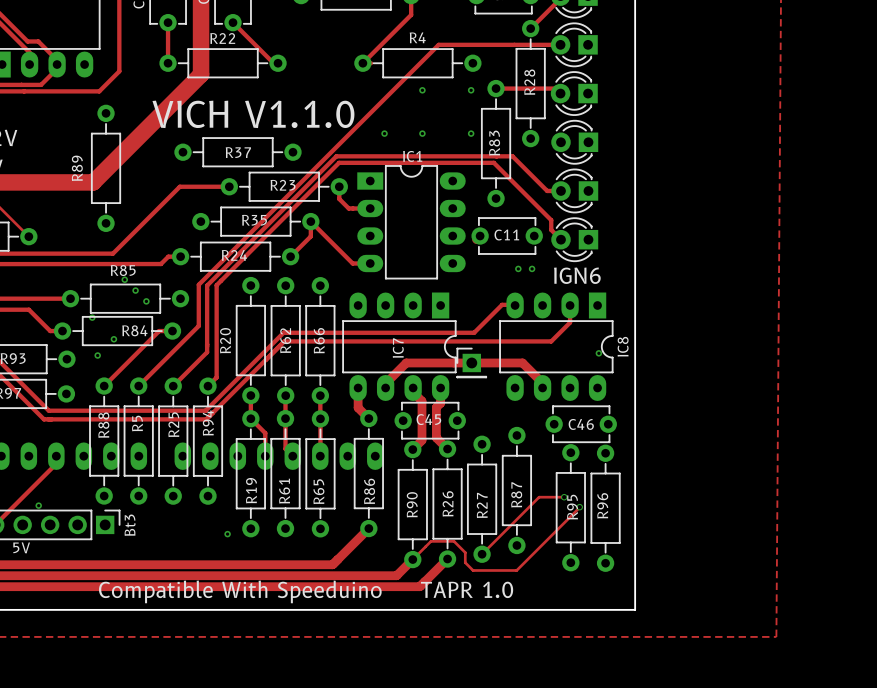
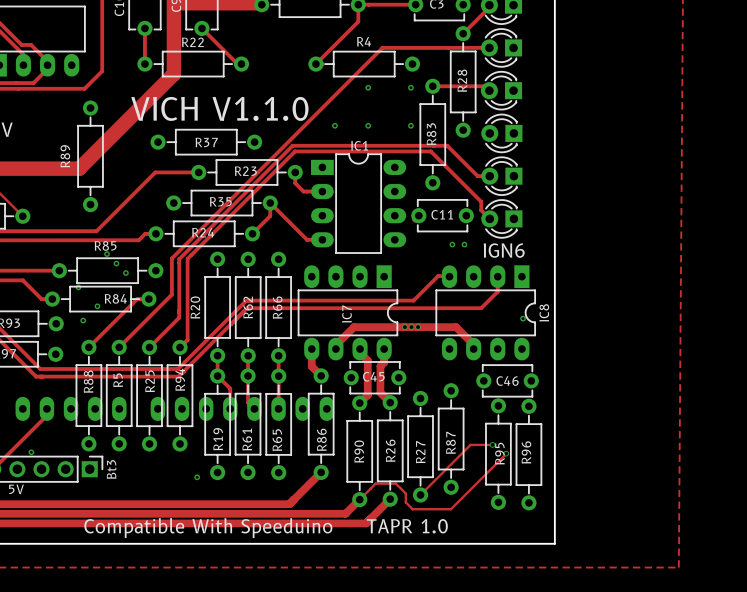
via: none -> (404, 327)
part: (471, 362) -> none
via: none -> (411, 327)
via: none -> (418, 327)

